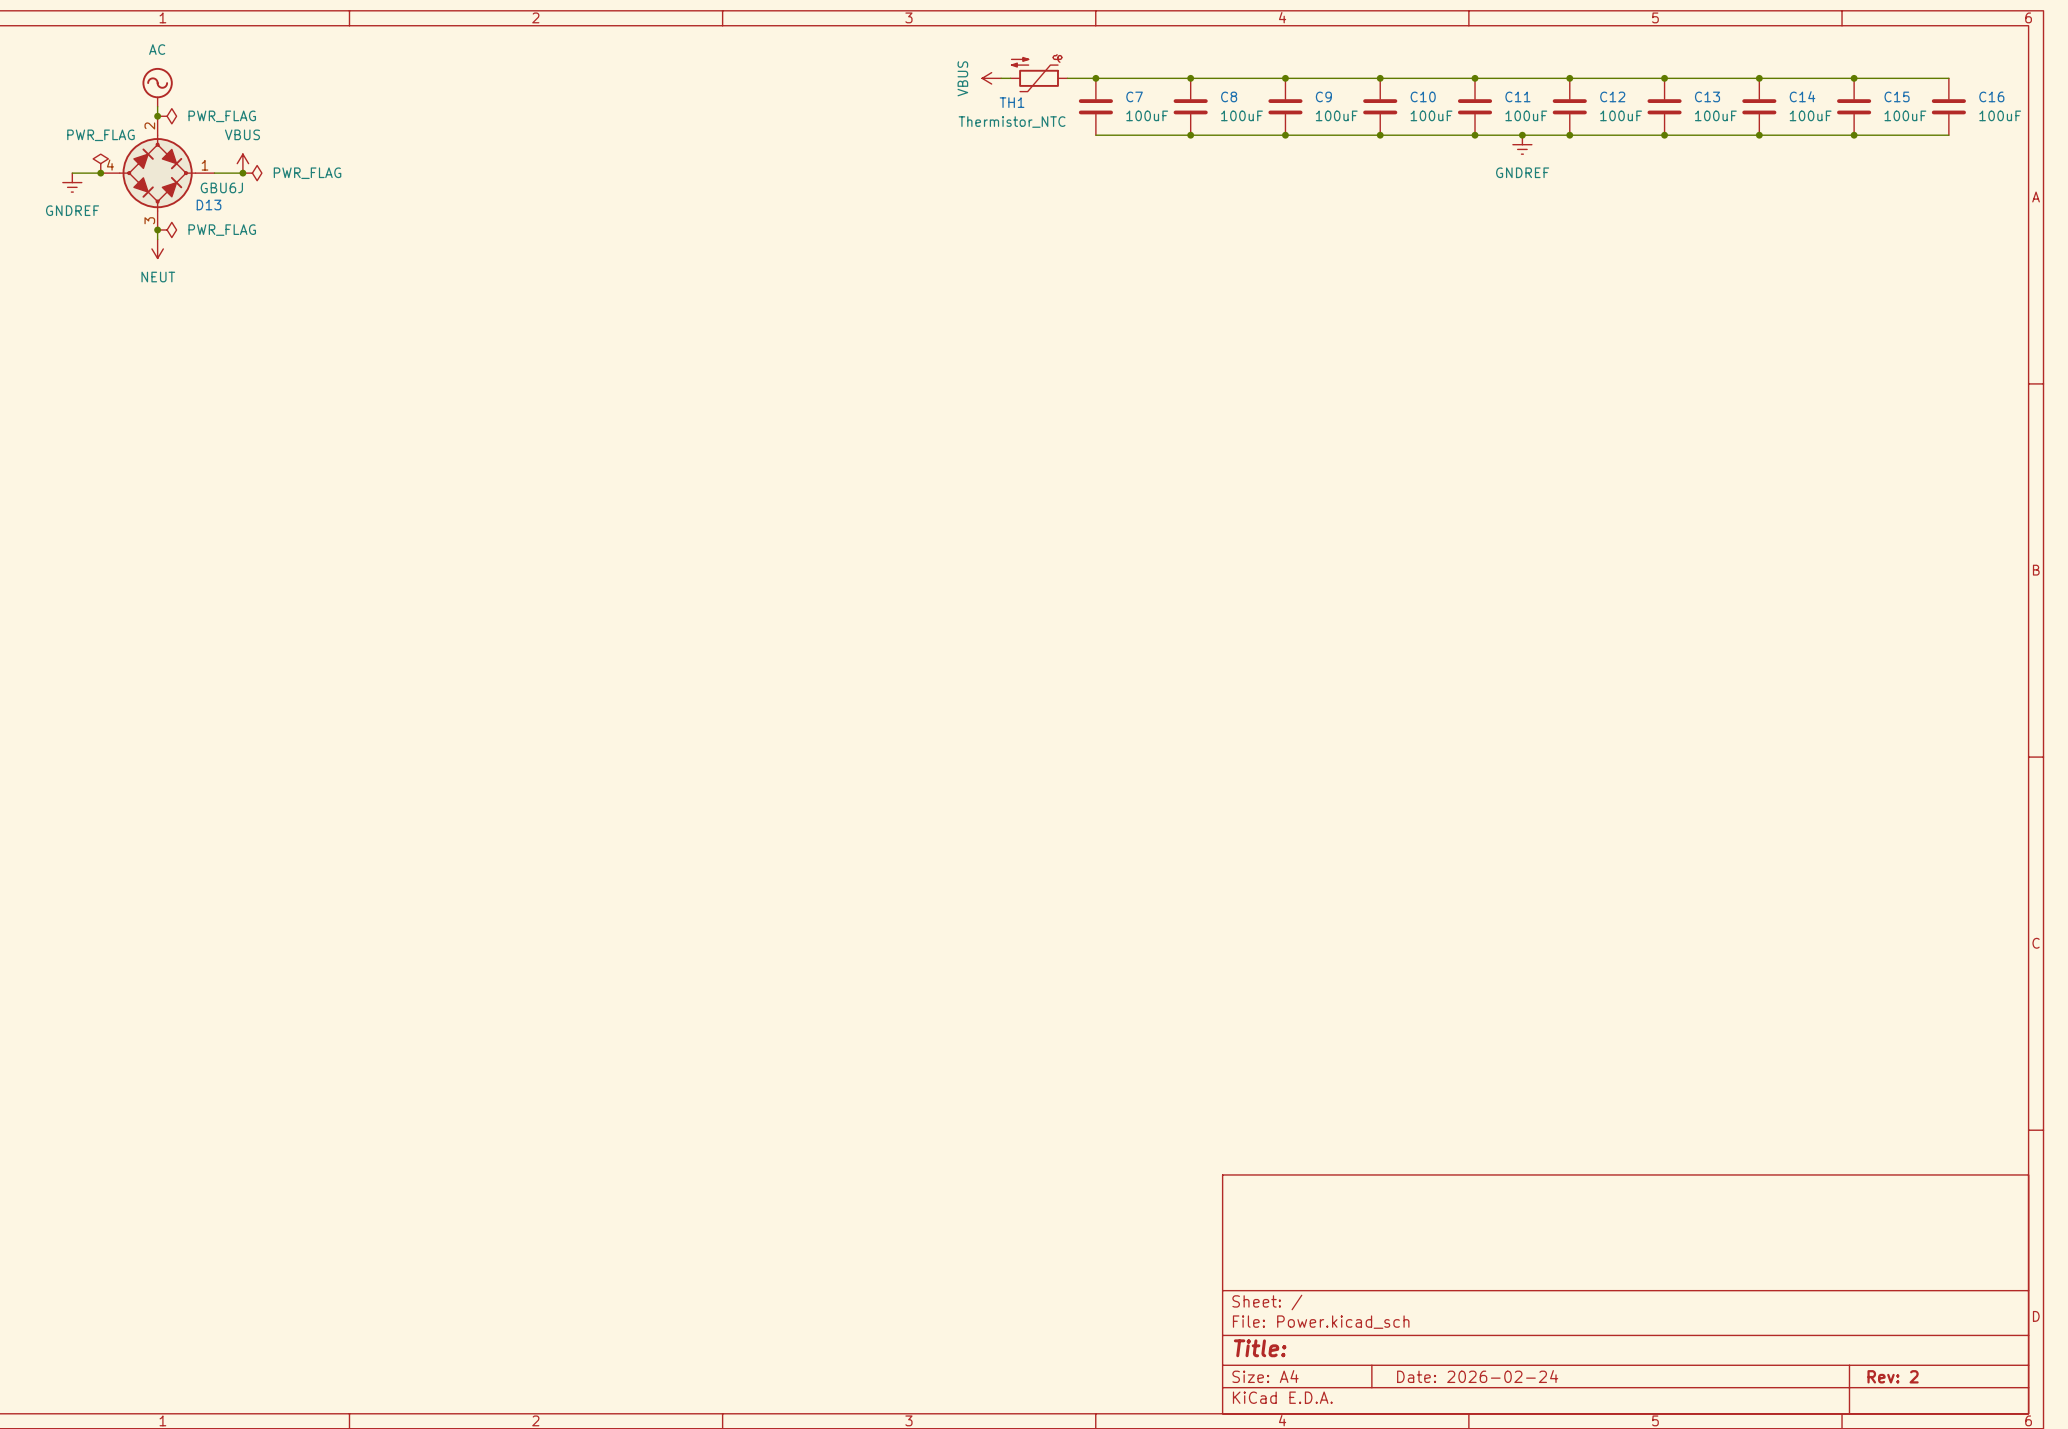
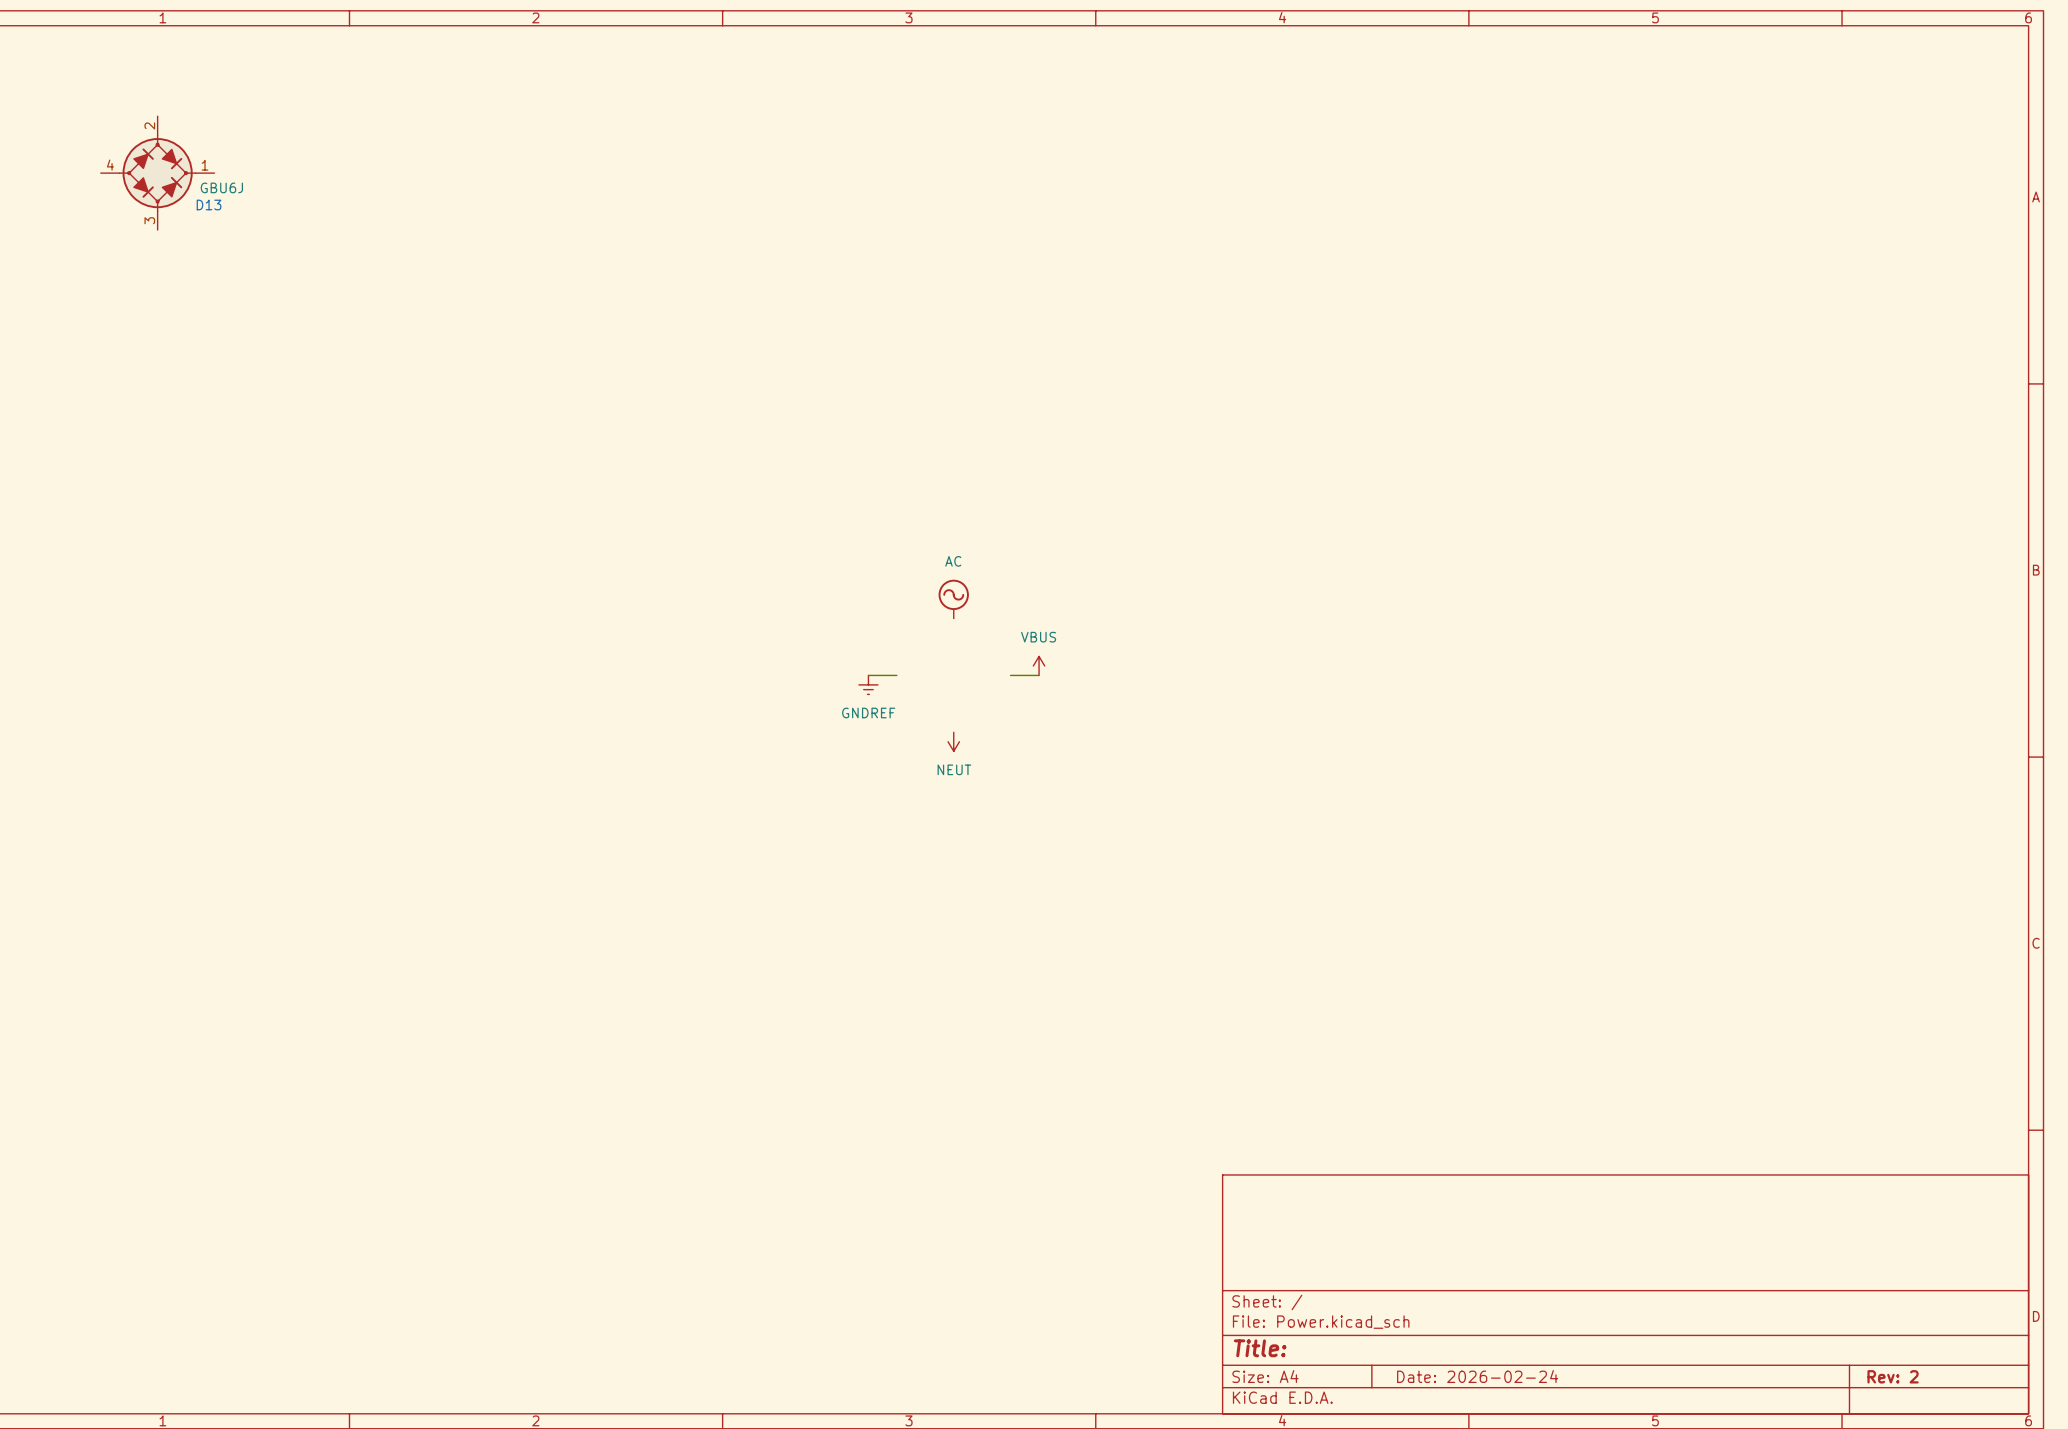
TH1: Thermistor_NTC (1039, 73) -> none
power symbol: VBUS (991, 78) -> none
wire: (1001, 78) (1010, 78) -> none
wire: (1067, 78) (1948, 78) -> none
junction: (1095, 78) -> none
junction: (1190, 78) -> none
junction: (1285, 78) -> none
junction: (1380, 78) -> none
junction: (1475, 78) -> none
junction: (1569, 78) -> none
junction: (1664, 78) -> none
junction: (1759, 78) -> none
junction: (1854, 78) -> none
power symbol: AC (157, 87) -> none
wire: (157, 106) (157, 116) -> none
C7: 100uF (1095, 106) -> none
C8: 100uF (1190, 106) -> none
C9: 100uF (1285, 106) -> none
C10: 100uF (1380, 106) -> none
C11: 100uF (1475, 106) -> none
C12: 100uF (1569, 106) -> none
C13: 100uF (1664, 106) -> none
C14: 100uF (1759, 106) -> none
C15: 100uF (1854, 106) -> none
C16: 100uF (1948, 106) -> none
junction: (157, 116) -> none
power symbol: PWR_FLAG (167, 116) -> none
wire: (1095, 135) (1948, 135) -> none
junction: (1190, 135) -> none
junction: (1285, 135) -> none
junction: (1380, 135) -> none
junction: (1475, 135) -> none
junction: (1522, 135) -> none
junction: (1569, 135) -> none
junction: (1664, 135) -> none
junction: (1759, 135) -> none
junction: (1854, 135) -> none
power symbol: GNDREF (1522, 144) -> none
power symbol: PWR_FLAG (100, 163) -> none
power symbol: VBUS (242, 163) -> none
wire: (72, 173) (100, 173) -> none
junction: (100, 173) -> none
wire: (214, 173) (242, 173) -> none
junction: (242, 173) -> none
power symbol: PWR_FLAG (252, 173) -> none
power symbol: GNDREF (72, 182) -> none
wire: (157, 229) (157, 239) -> none
junction: (157, 229) -> none
power symbol: PWR_FLAG (167, 229) -> none
power symbol: NEUT (157, 248) -> none
power symbol: none -> AC (953, 599)
power symbol: none -> VBUS (1039, 665)
wire: none -> (868, 675) (896, 675)
wire: none -> (1010, 675) (1039, 675)
power symbol: none -> GNDREF (868, 684)
power symbol: none -> NEUT (953, 741)

